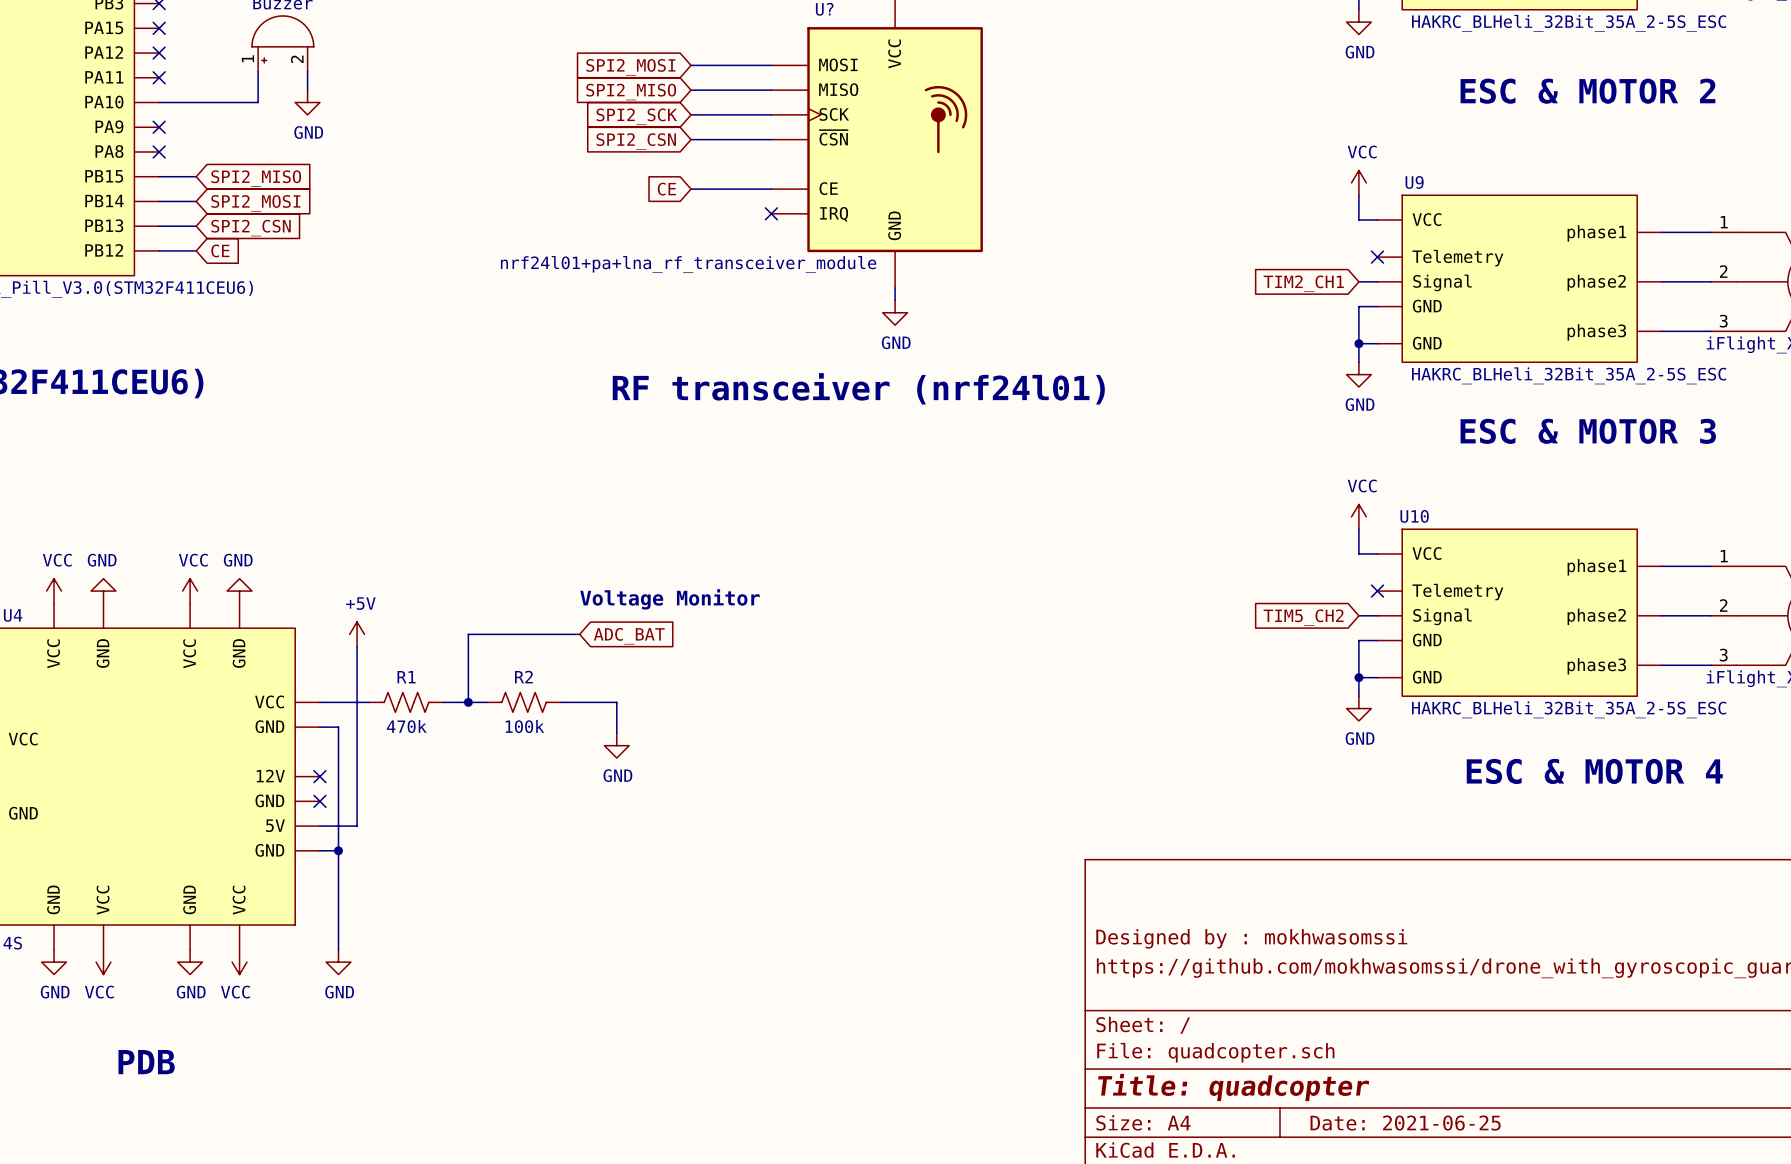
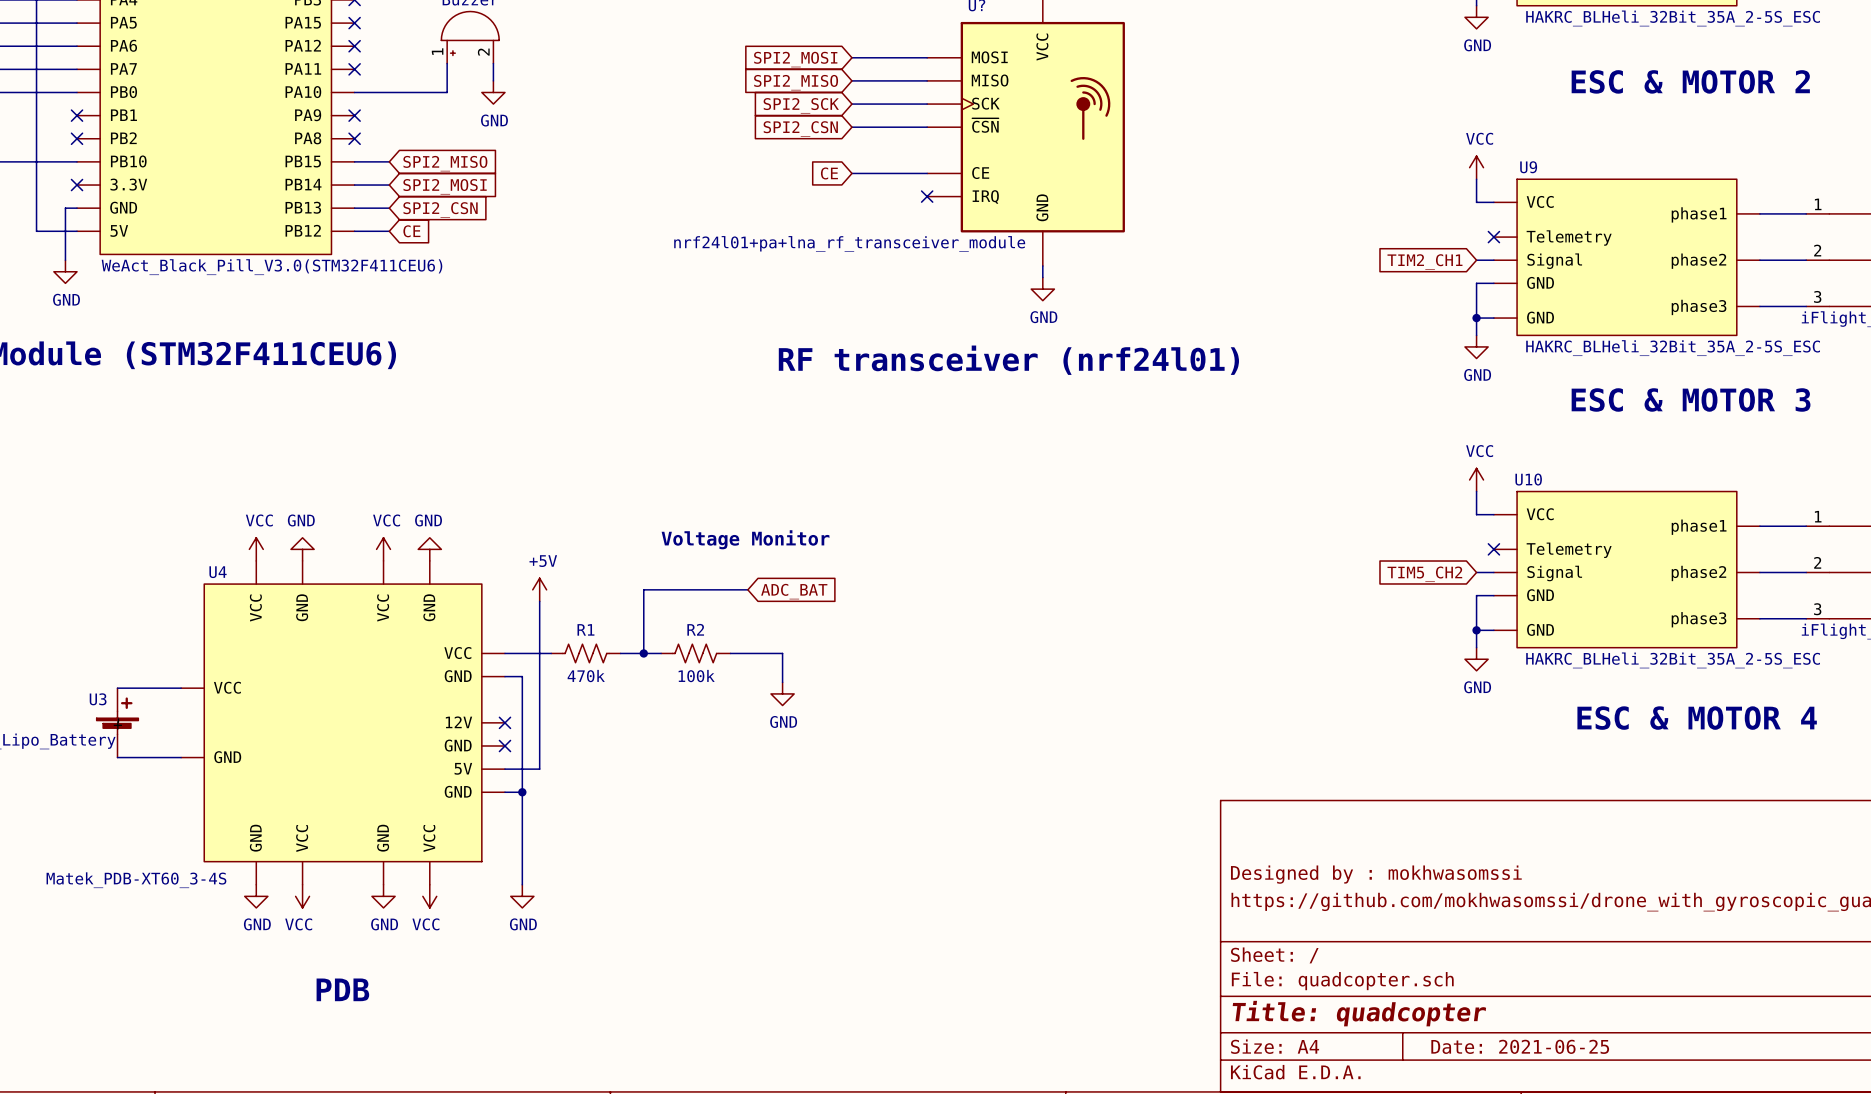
text position: Voltage Monitor (669, 599) -> Voltage Monitor (745, 539)

